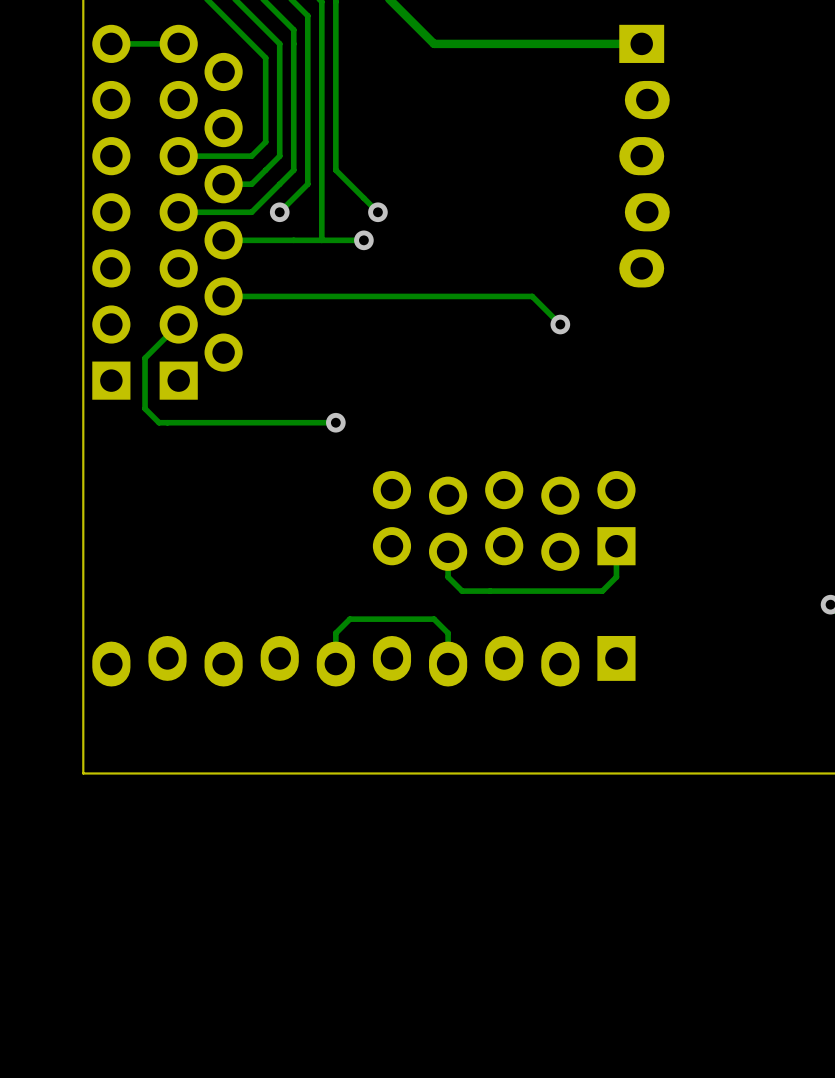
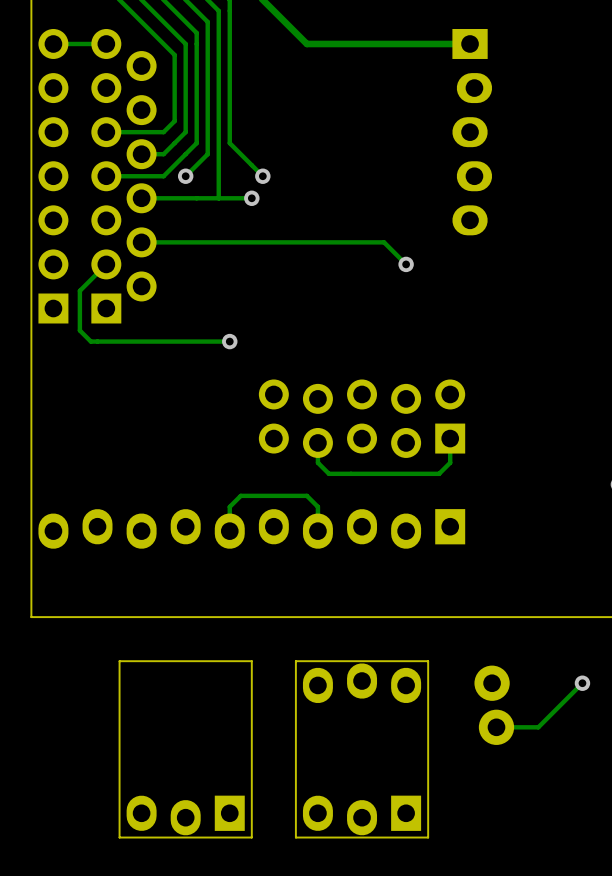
board edge: none -> (251, 661) (119, 661) (119, 837) (251, 837) (251, 661)
board edge: none -> (428, 661) (295, 661) (295, 837) (428, 837) (428, 661)
part: none -> (362, 683)
track: none -> (582, 683) (538, 727) (496, 727)
via: none -> (582, 683)
part: none -> (494, 705)
part: none -> (185, 815)
part: none -> (362, 815)

